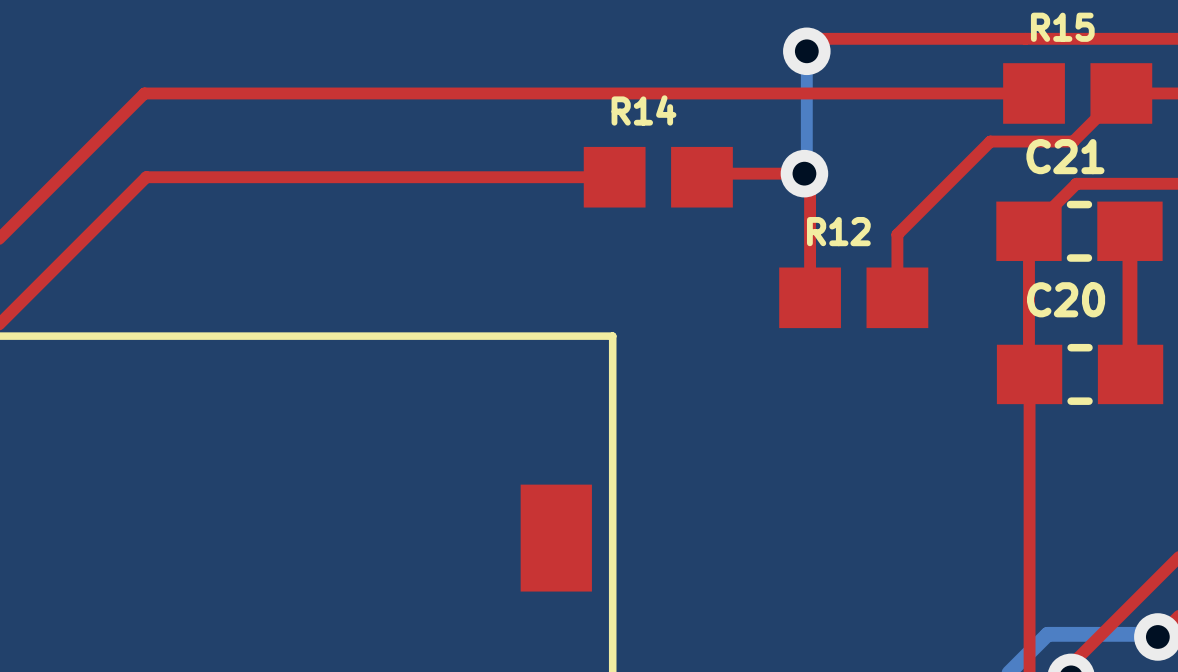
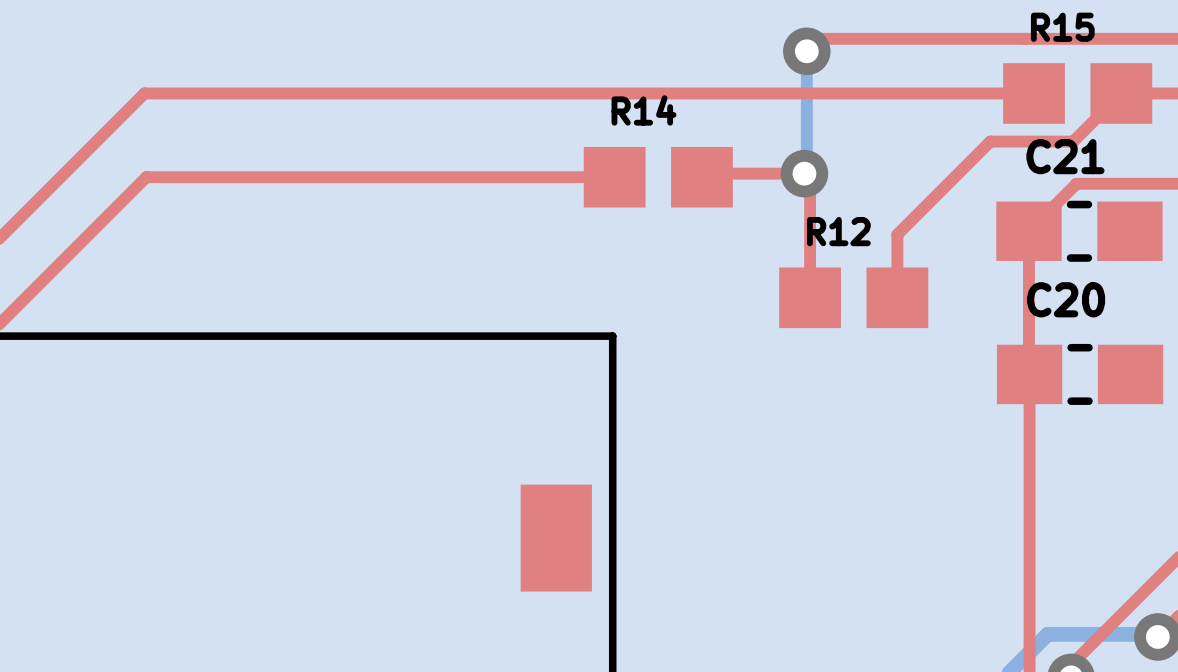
top track: (1129, 231) (1129, 373) -> none

